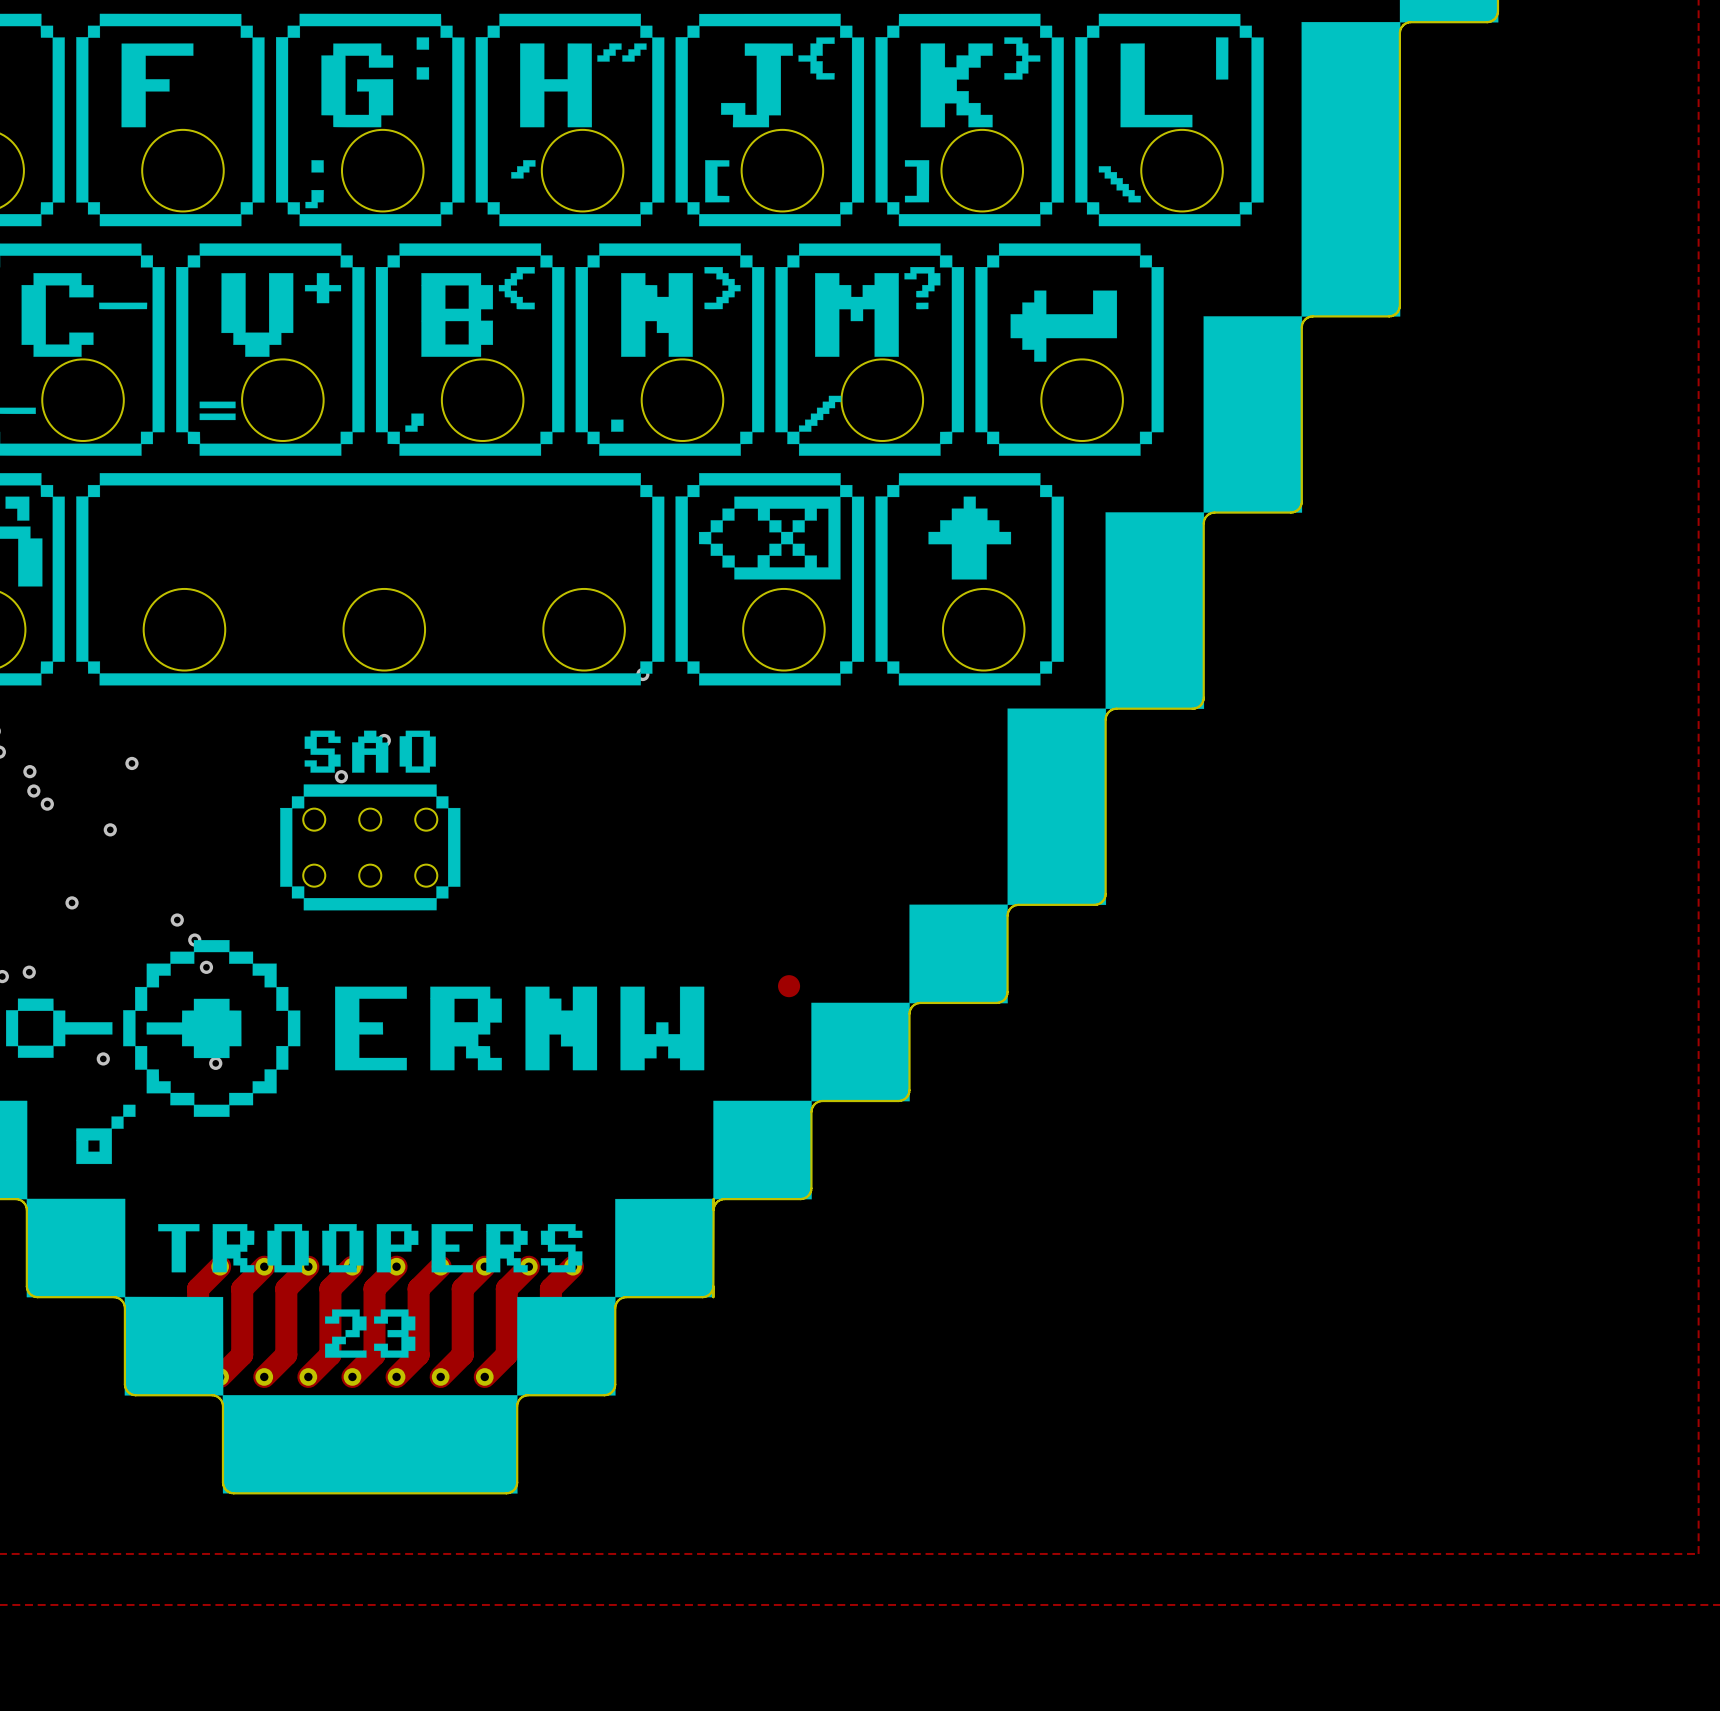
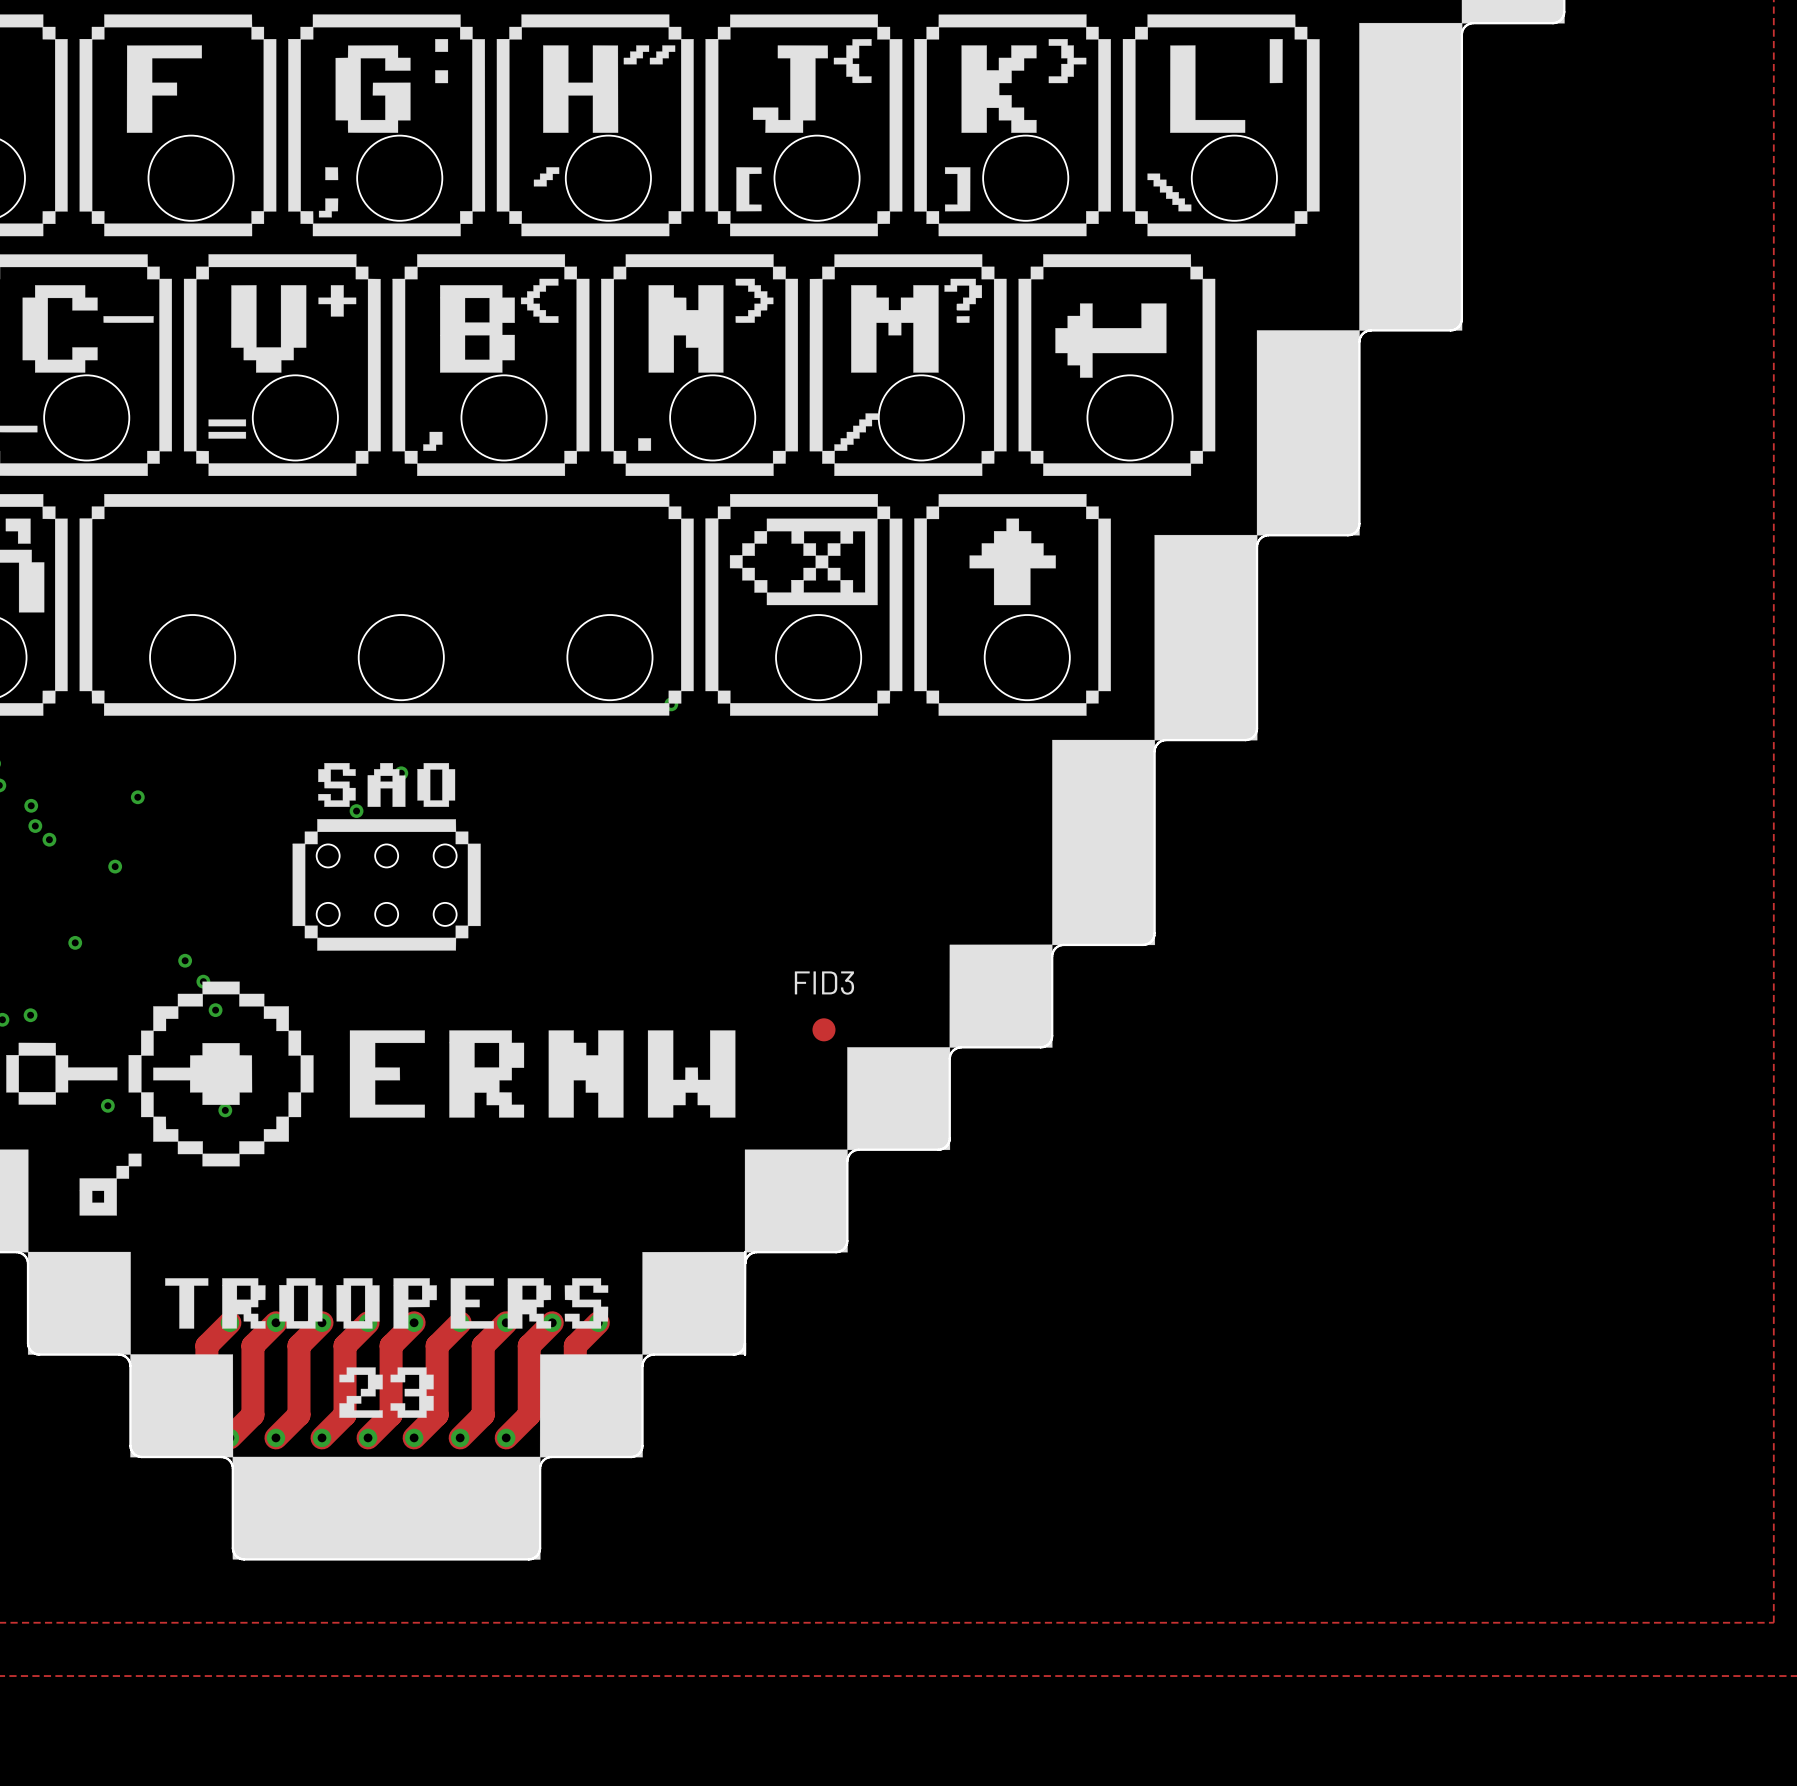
FID3 name: none -> FID3 (824, 983)

